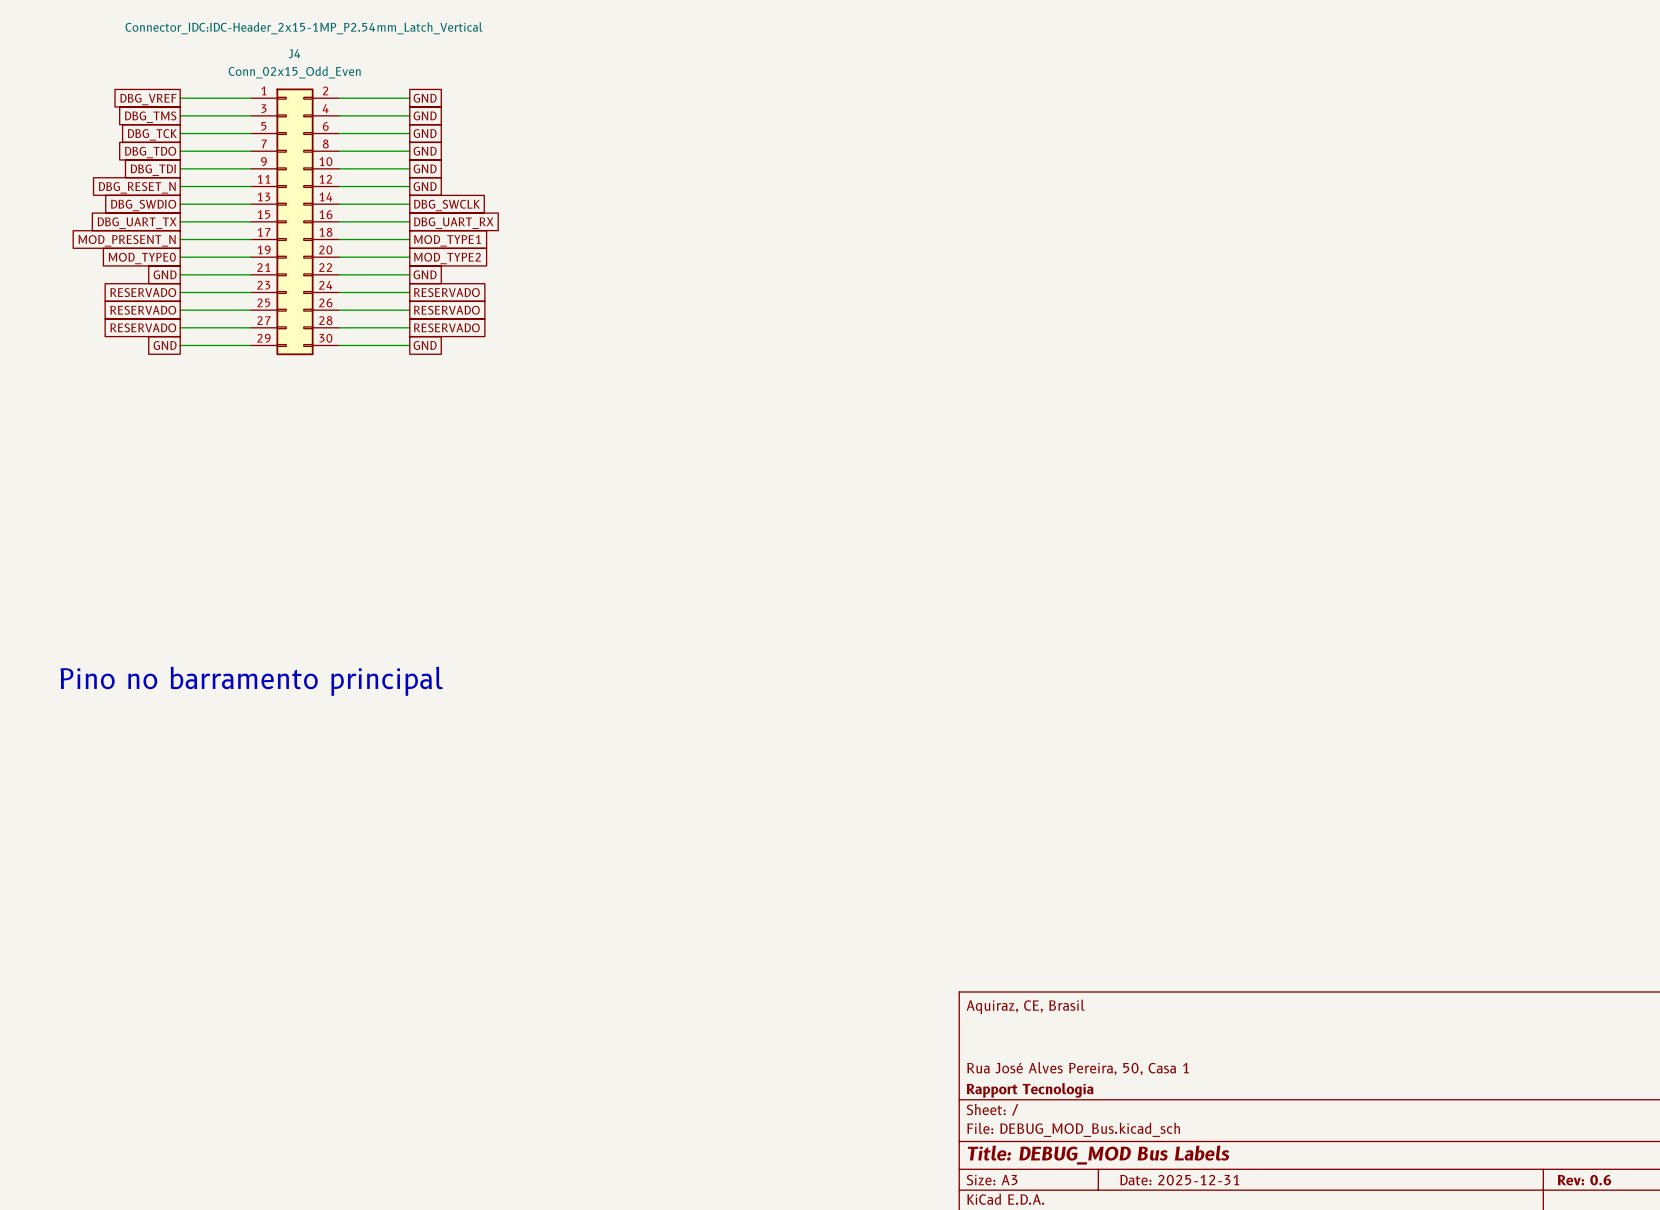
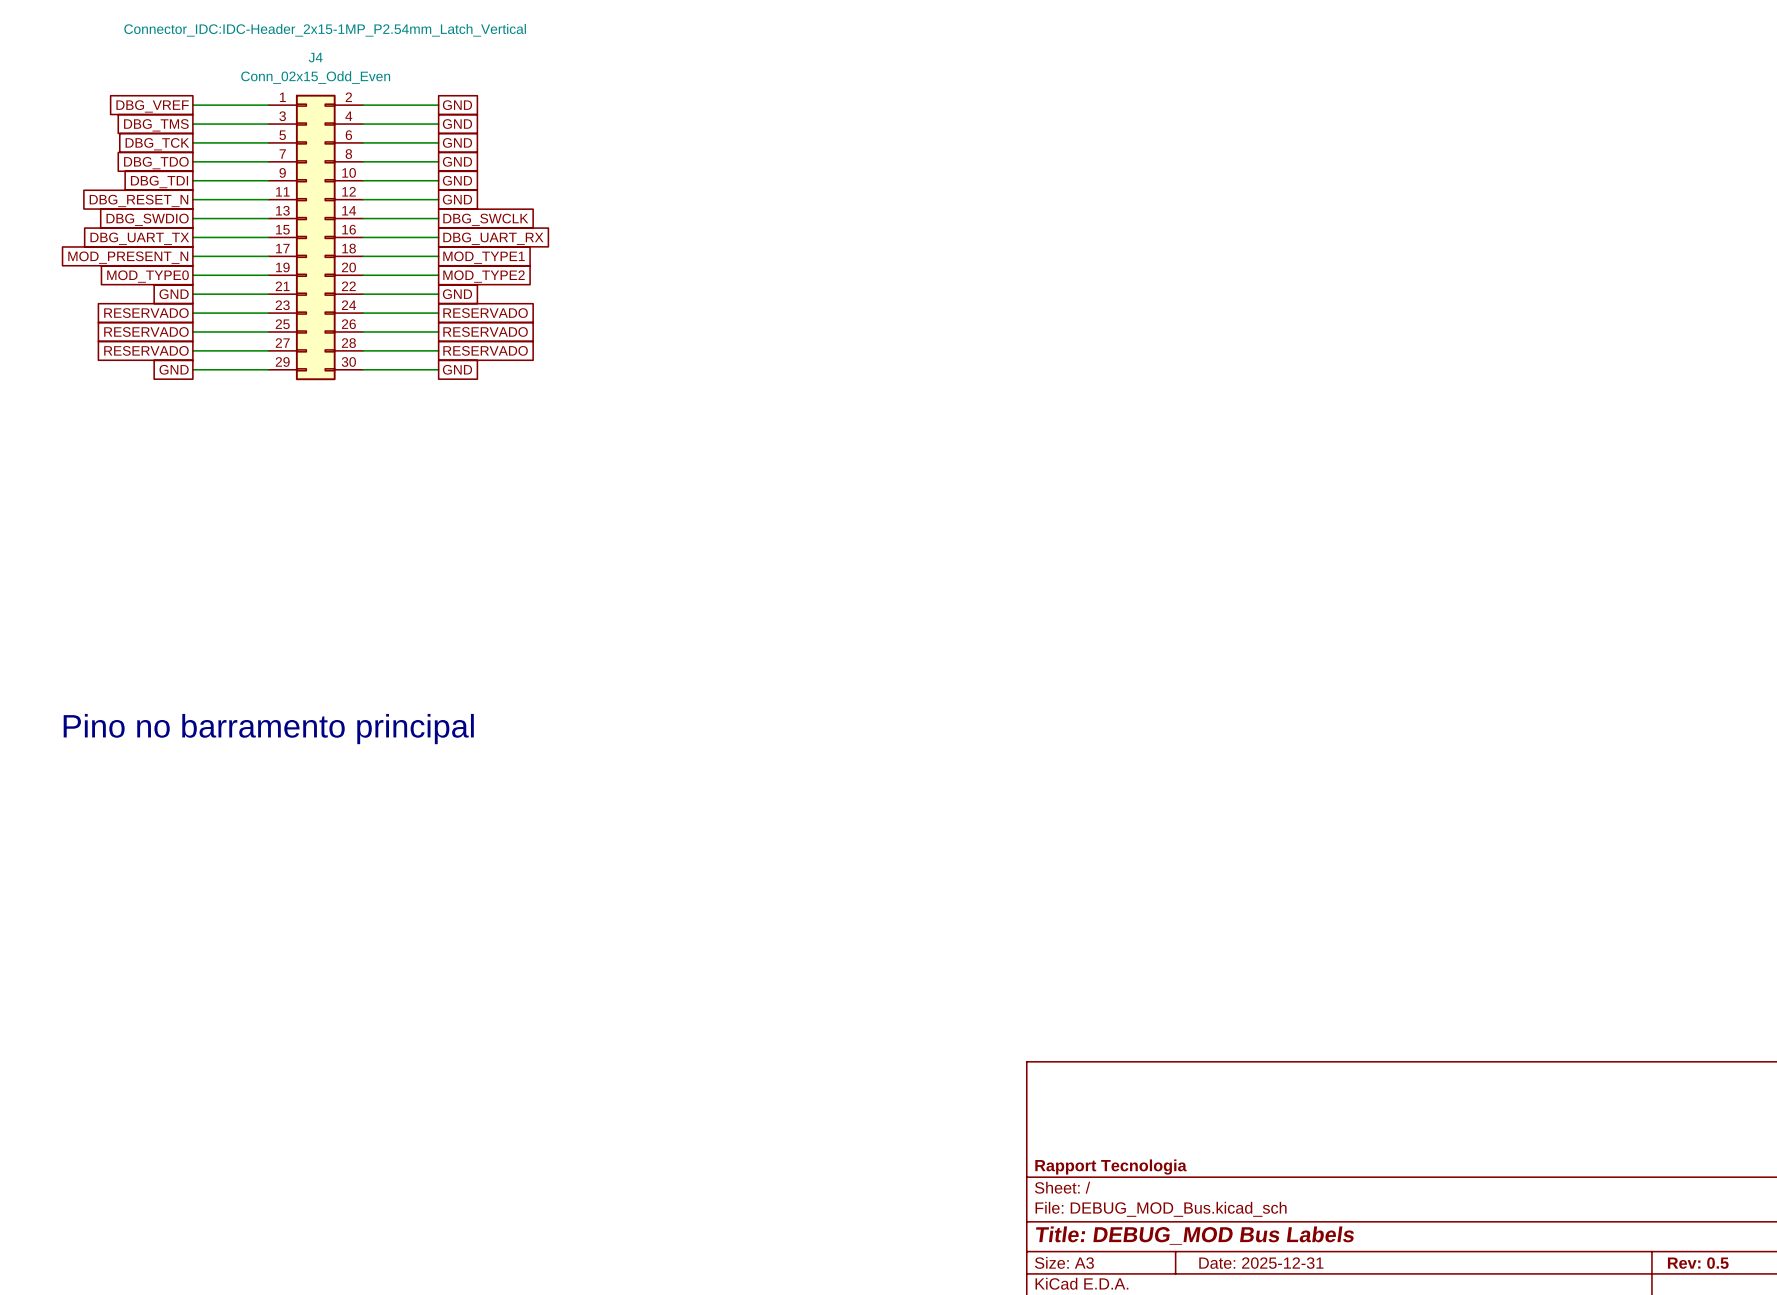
title block: Aquiraz, CE, Brasil (1025, 1006) -> none
title block: Rua José Alves Pereira, 50, Casa 1 (1078, 1068) -> none
title block: Rev: 0.6 (1584, 1180) -> Rev: 0.5 (1698, 1263)

